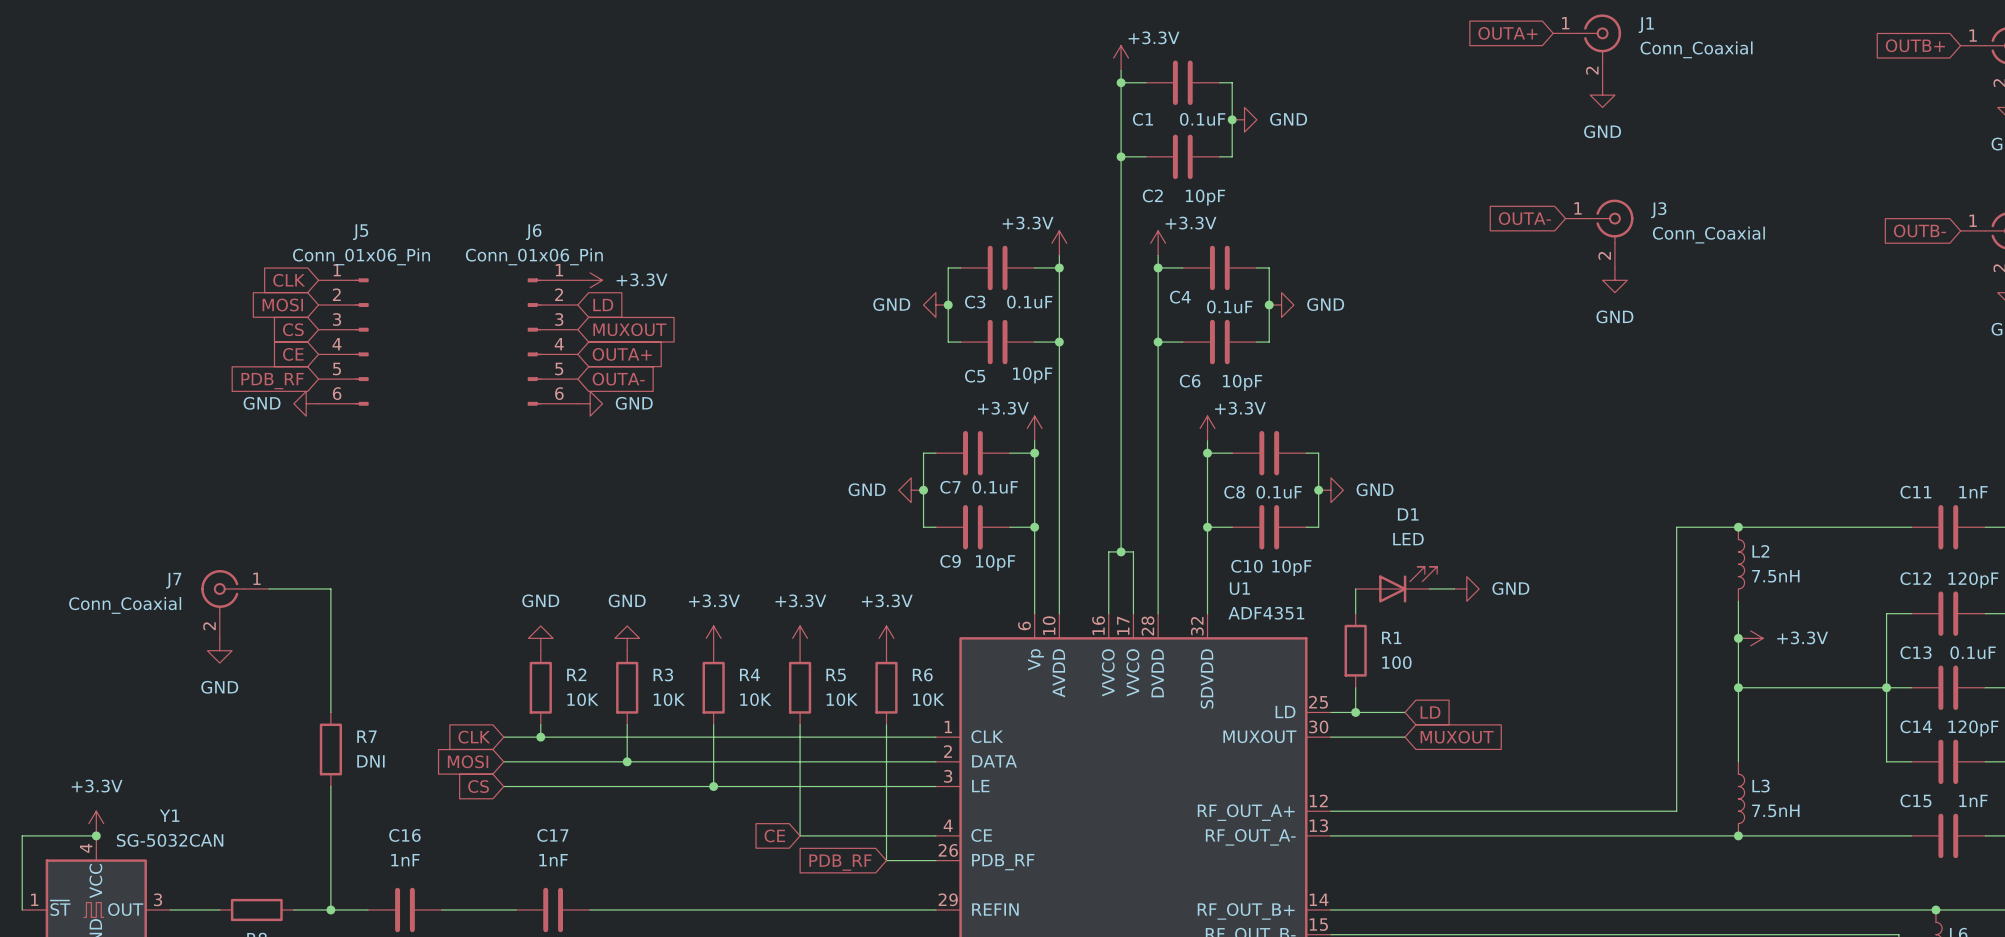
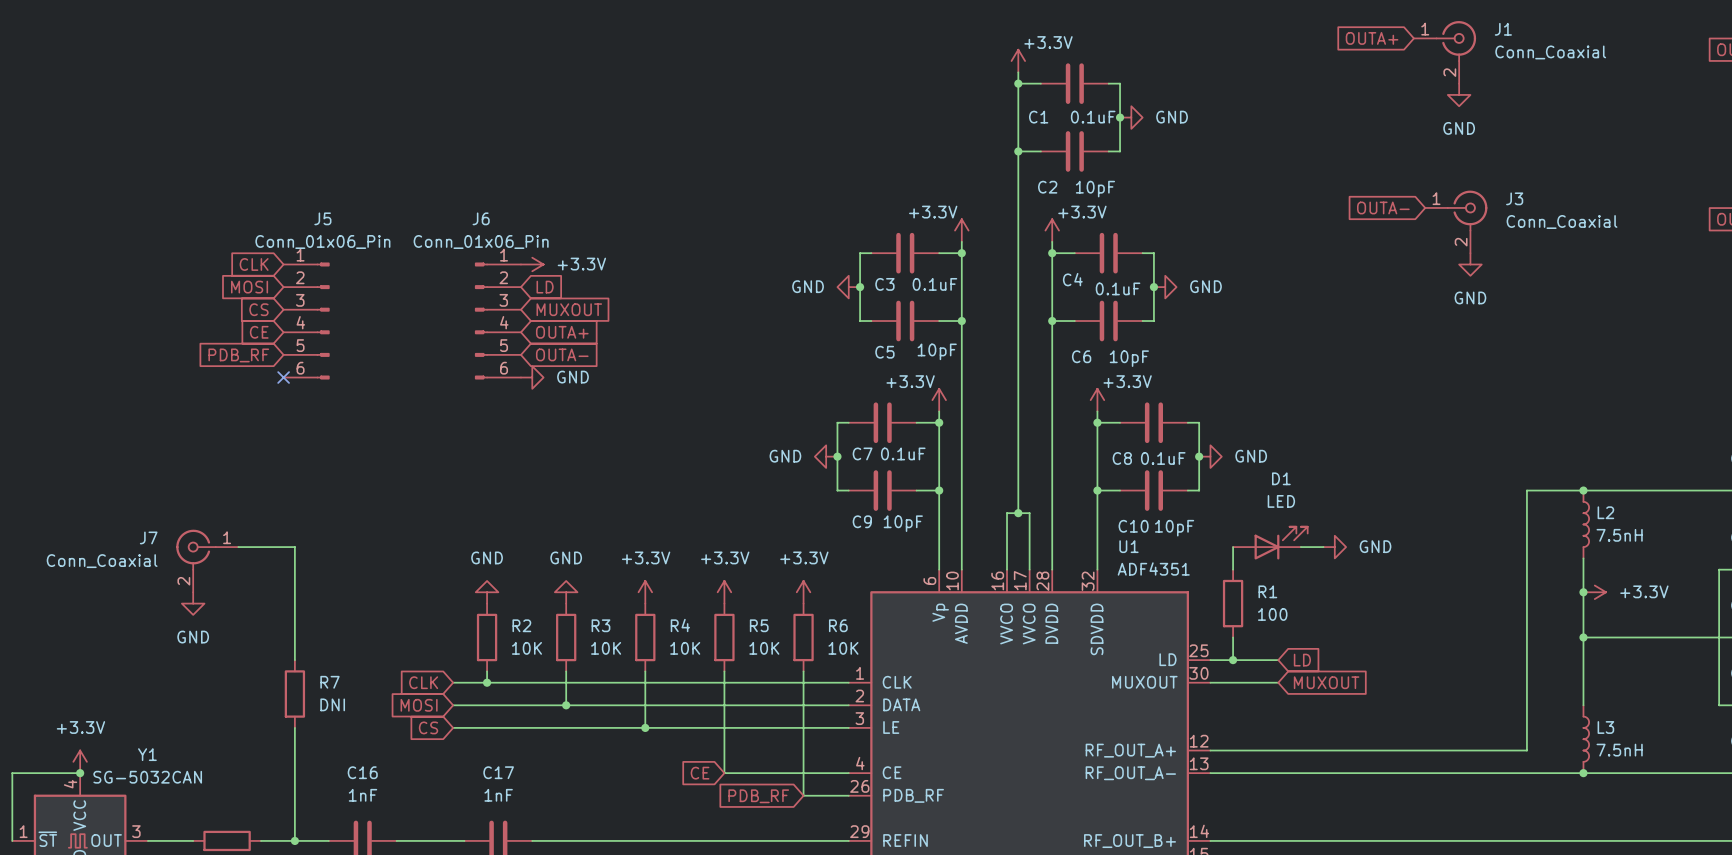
power symbol: GND (306, 403) -> none
no-connect mark: none -> (283, 377)
junction: (1886, 687) -> none

